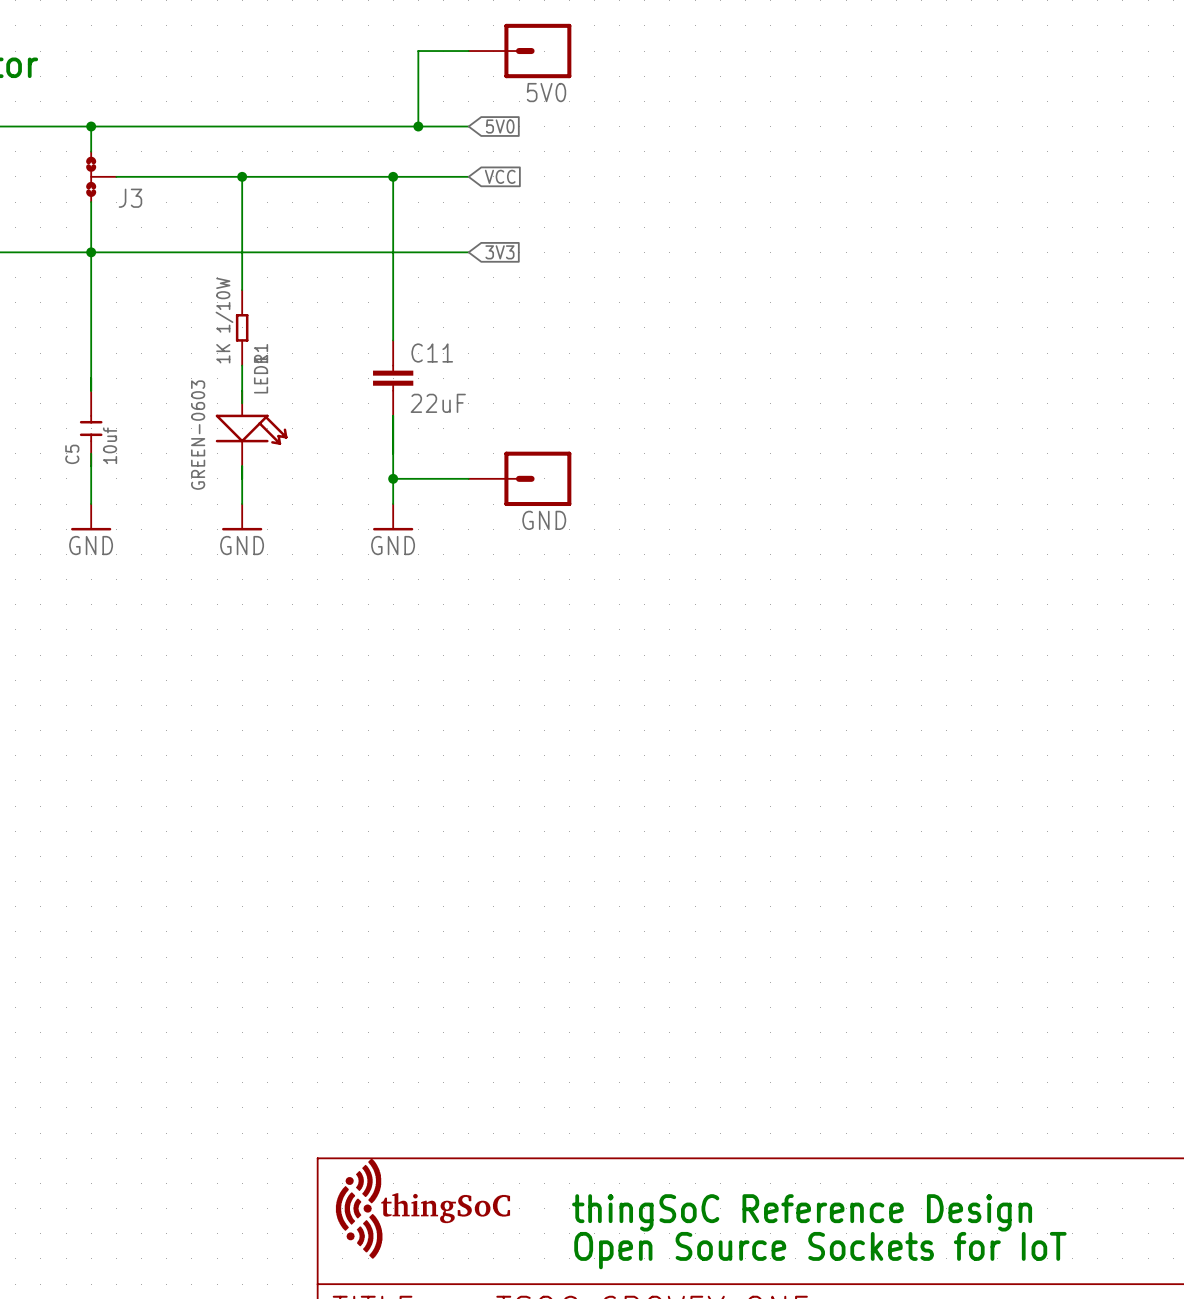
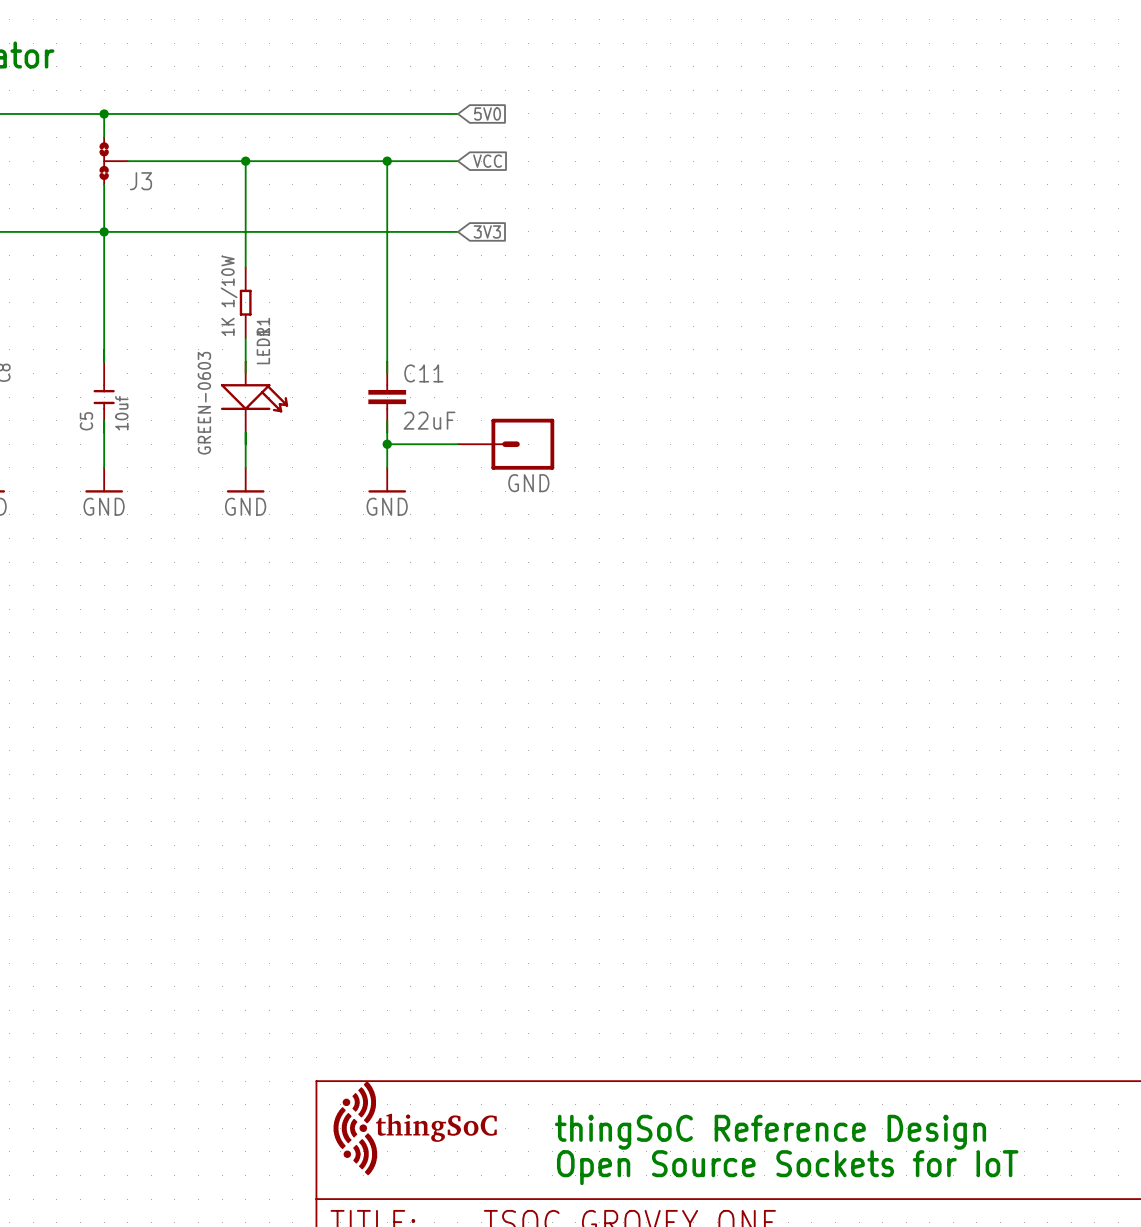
wire: (468, 51) (418, 51) (418, 126) -> none
5V0: (520, 51) -> none
junction: (418, 126) -> none
C11 position: (393, 378) -> (387, 397)

